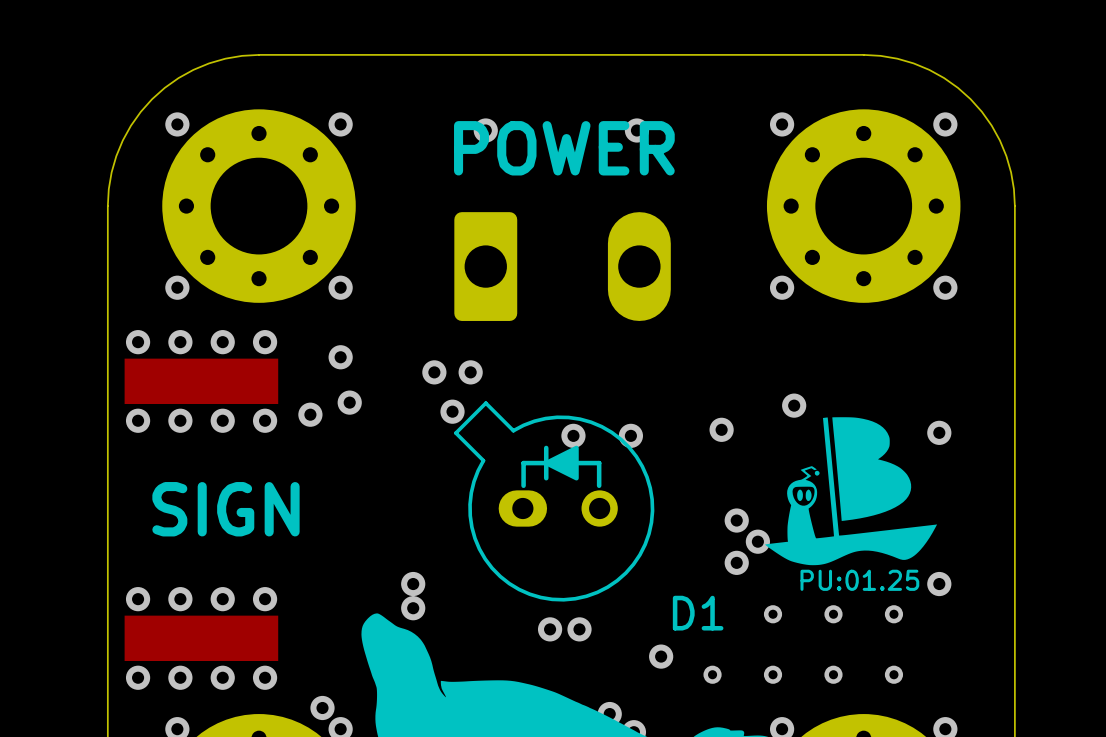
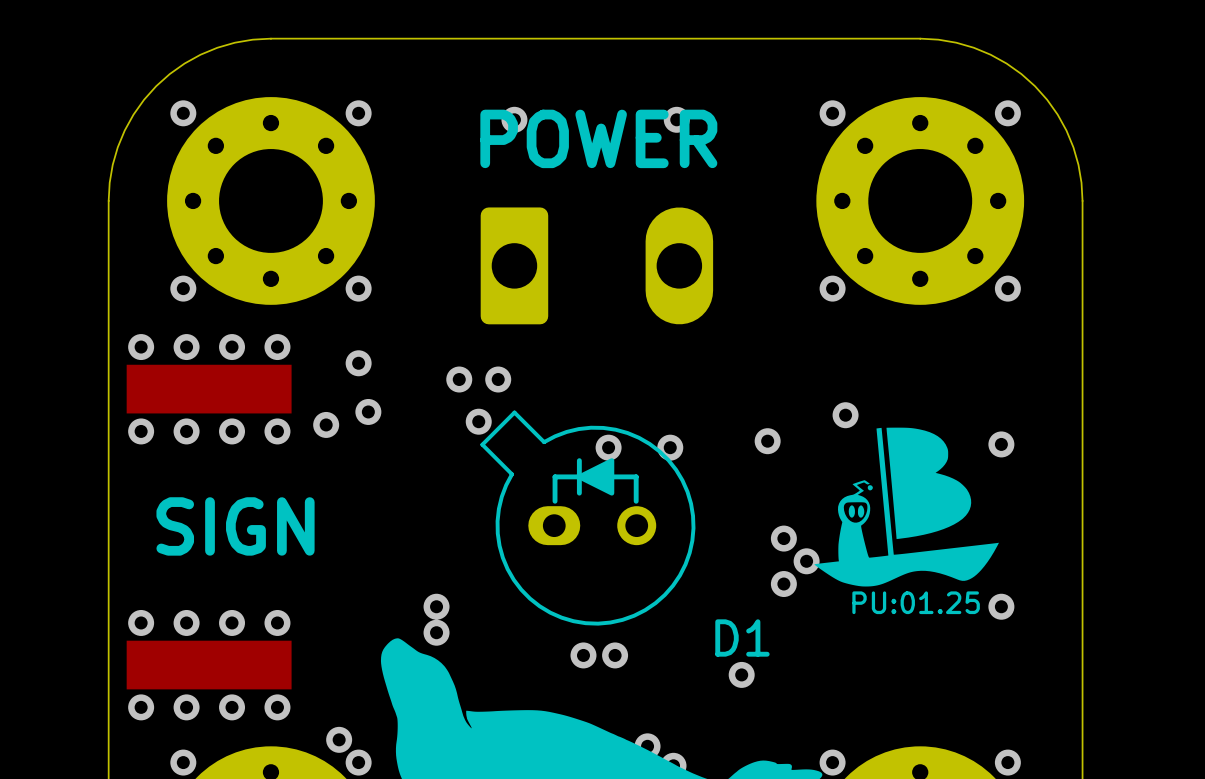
via: (773, 614) -> none
via: (833, 614) -> none
via: (893, 614) -> none
via position: (661, 656) -> (741, 674)
via: (712, 674) -> none
via: (773, 674) -> none
via: (833, 674) -> none
via: (893, 674) -> none

